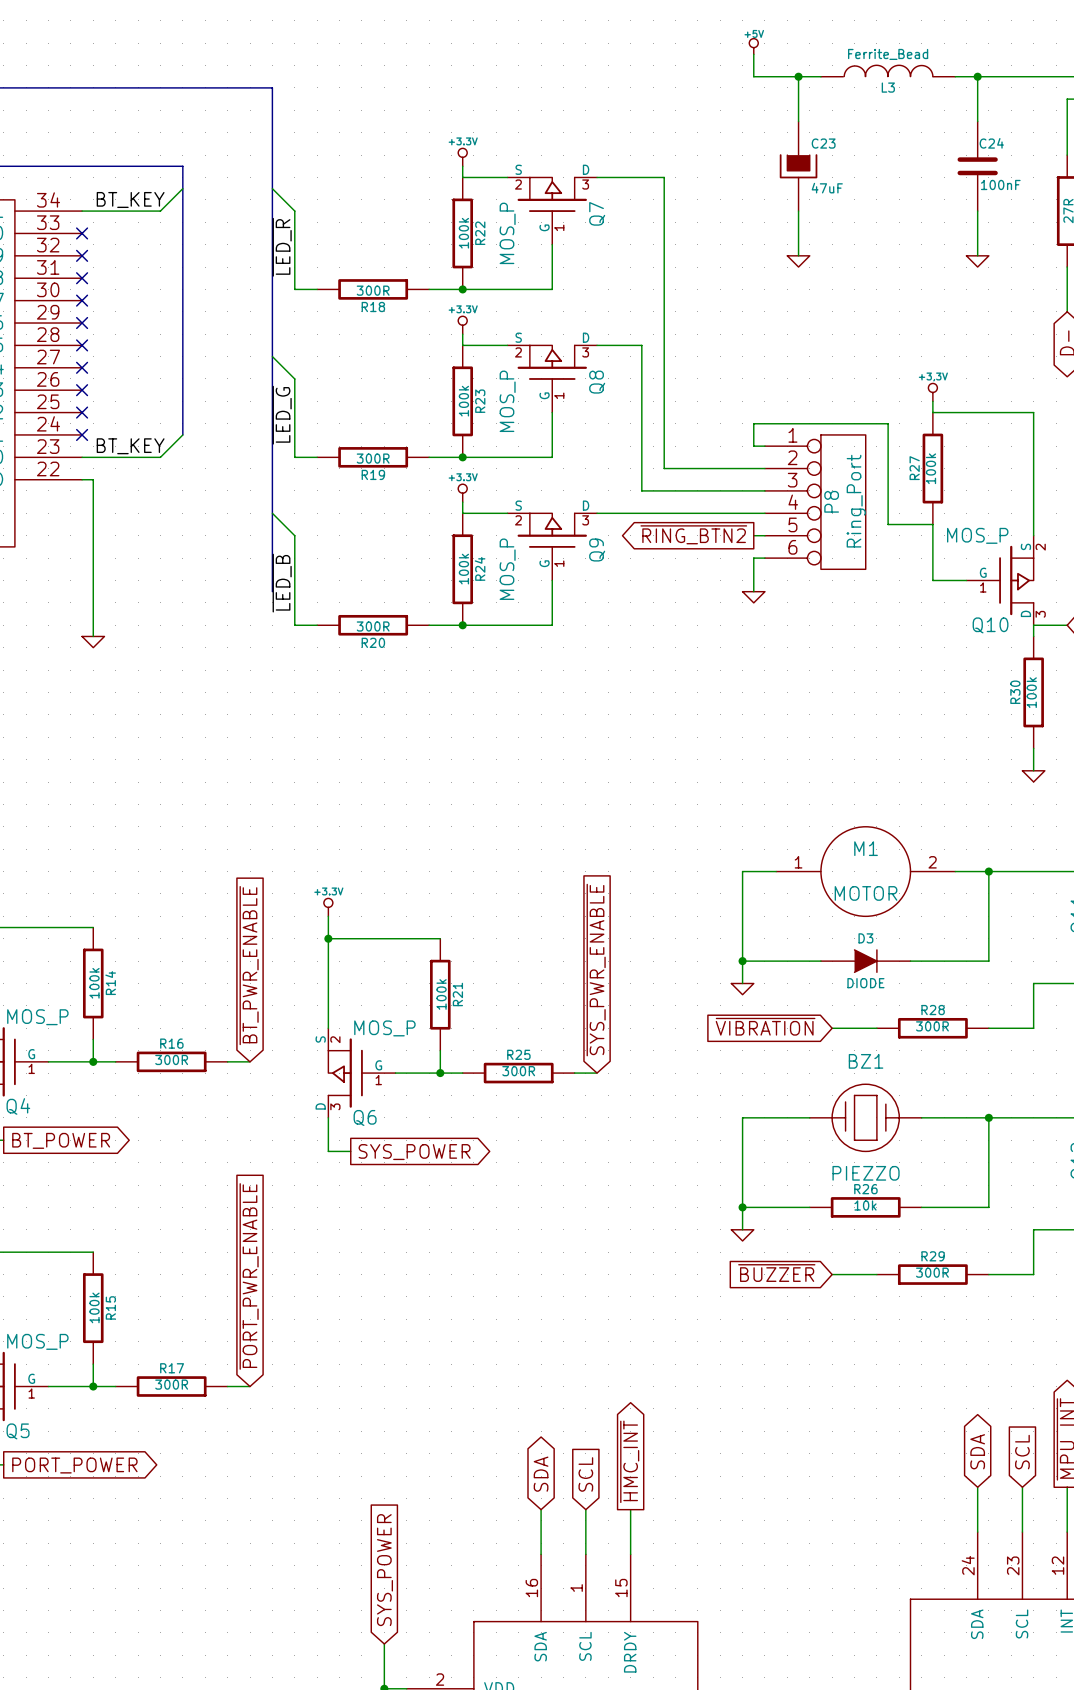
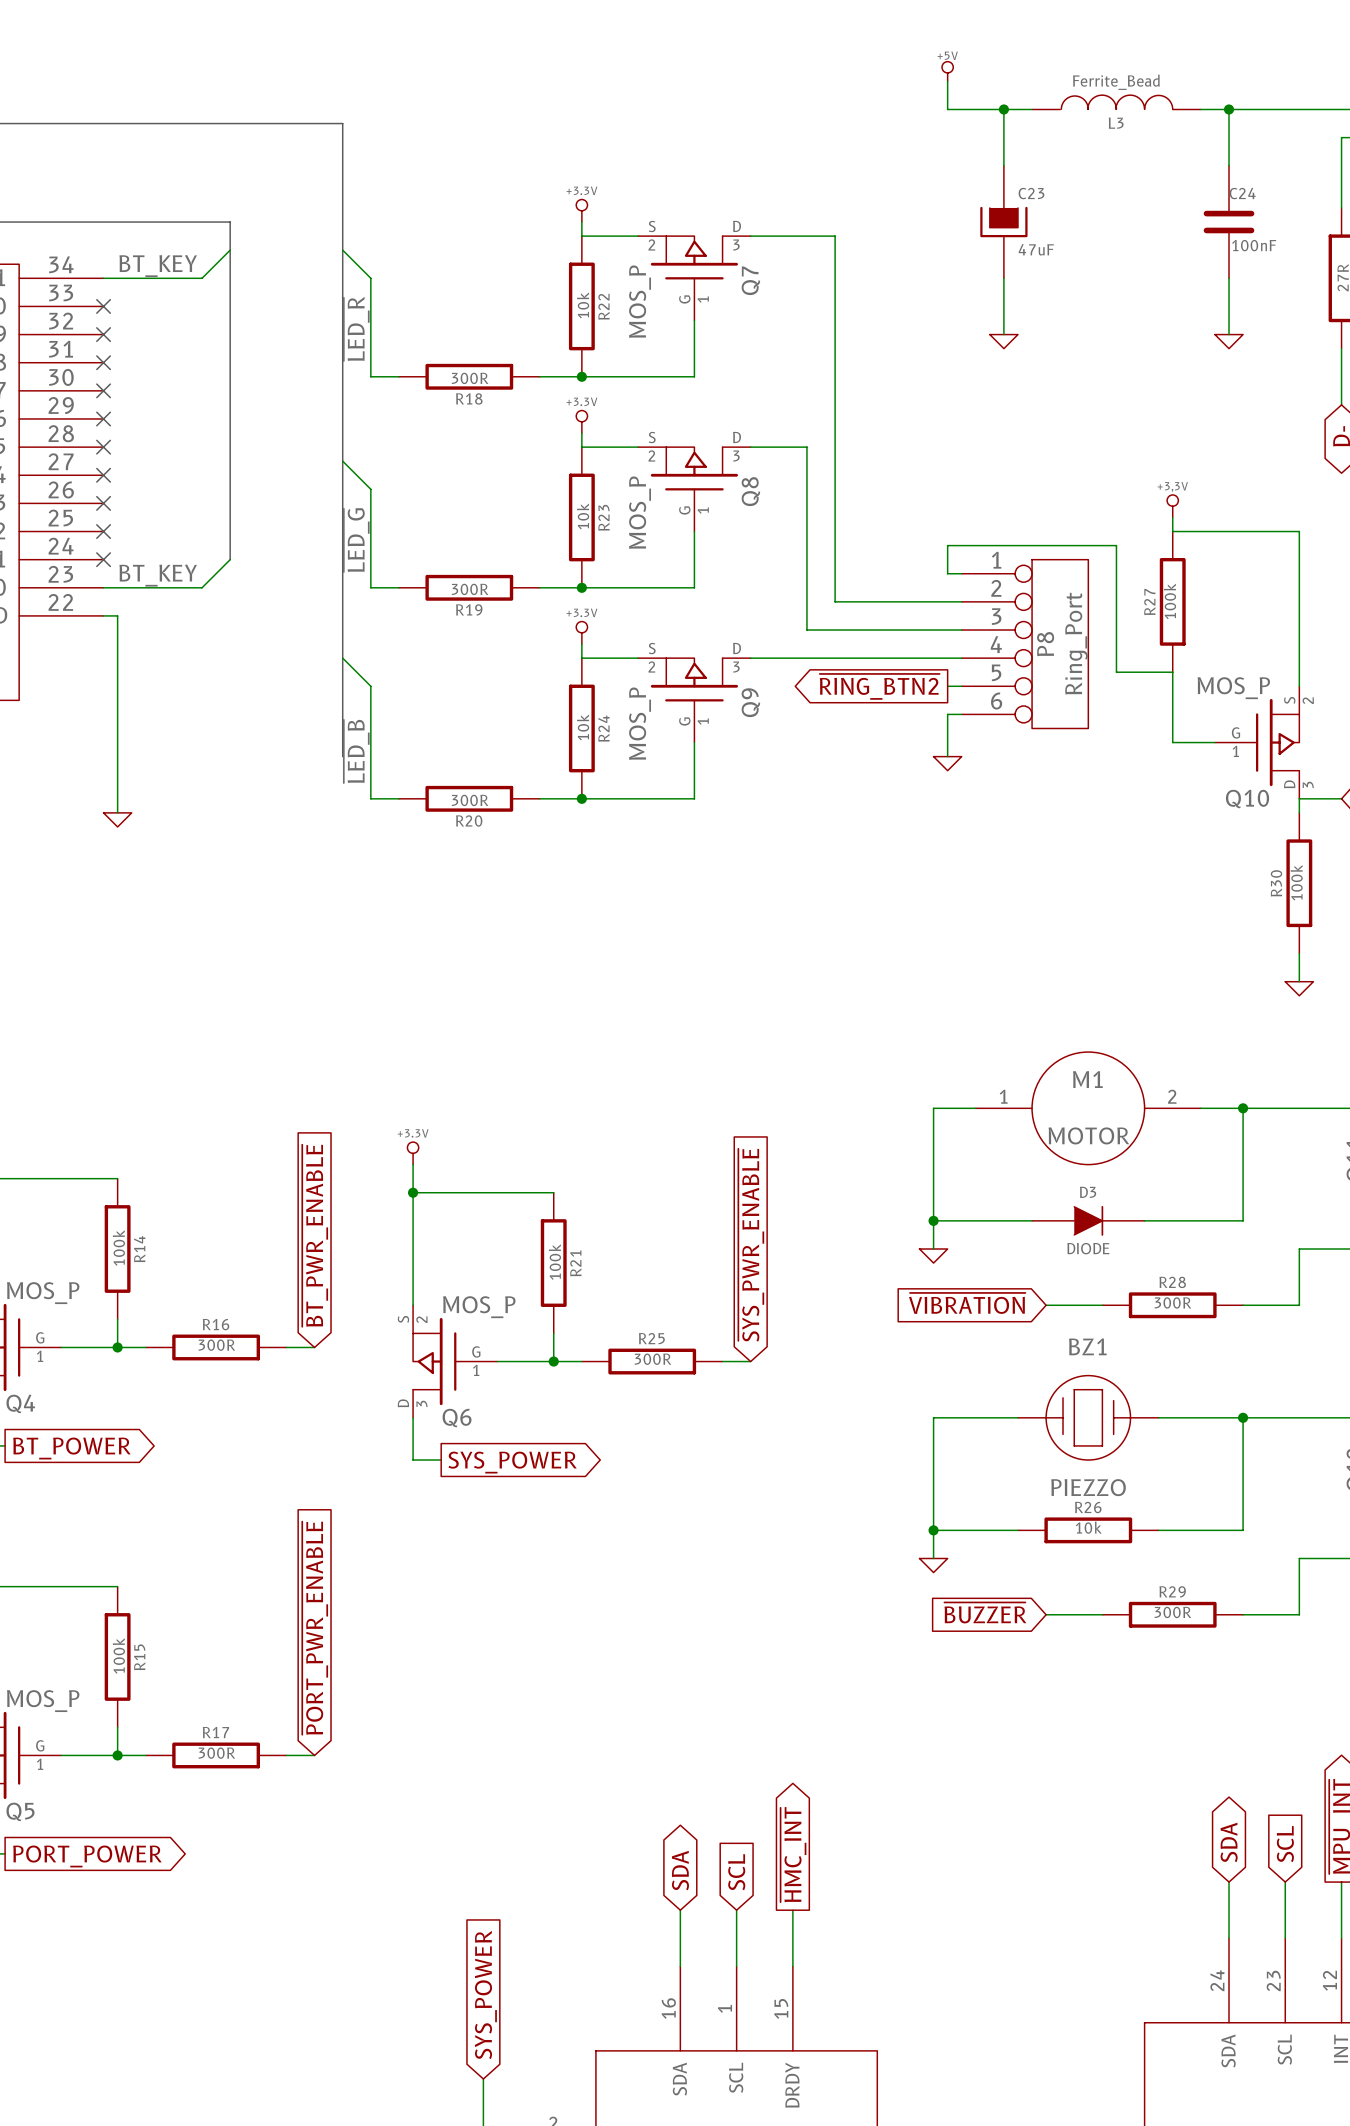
R22 value: 100k (463, 233) -> 10k (583, 305)
R23 value: 100k (463, 401) -> 10k (583, 516)
R24 value: 100k (463, 569) -> 10k (583, 727)

